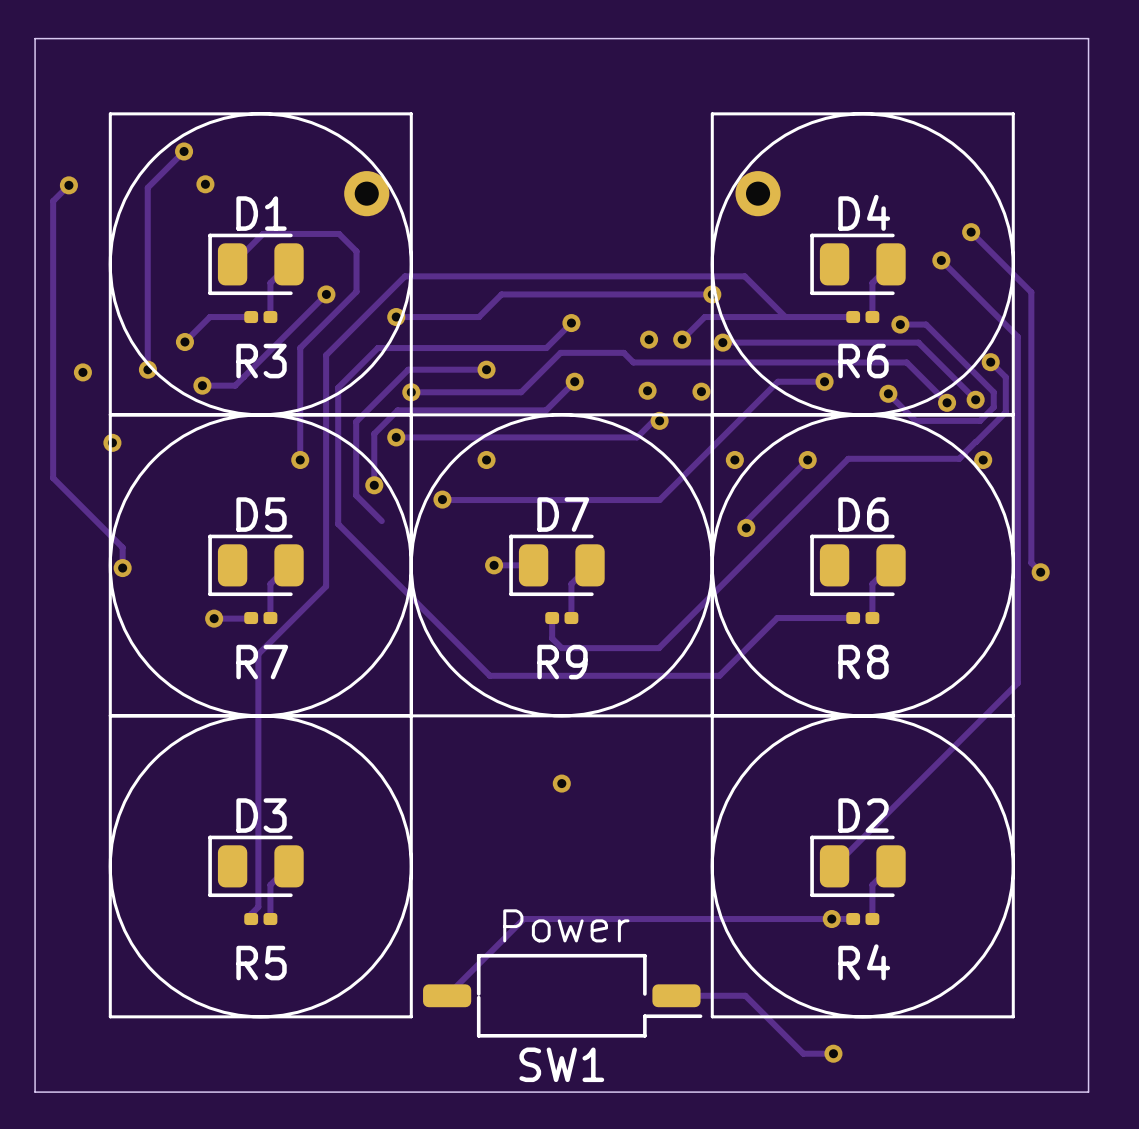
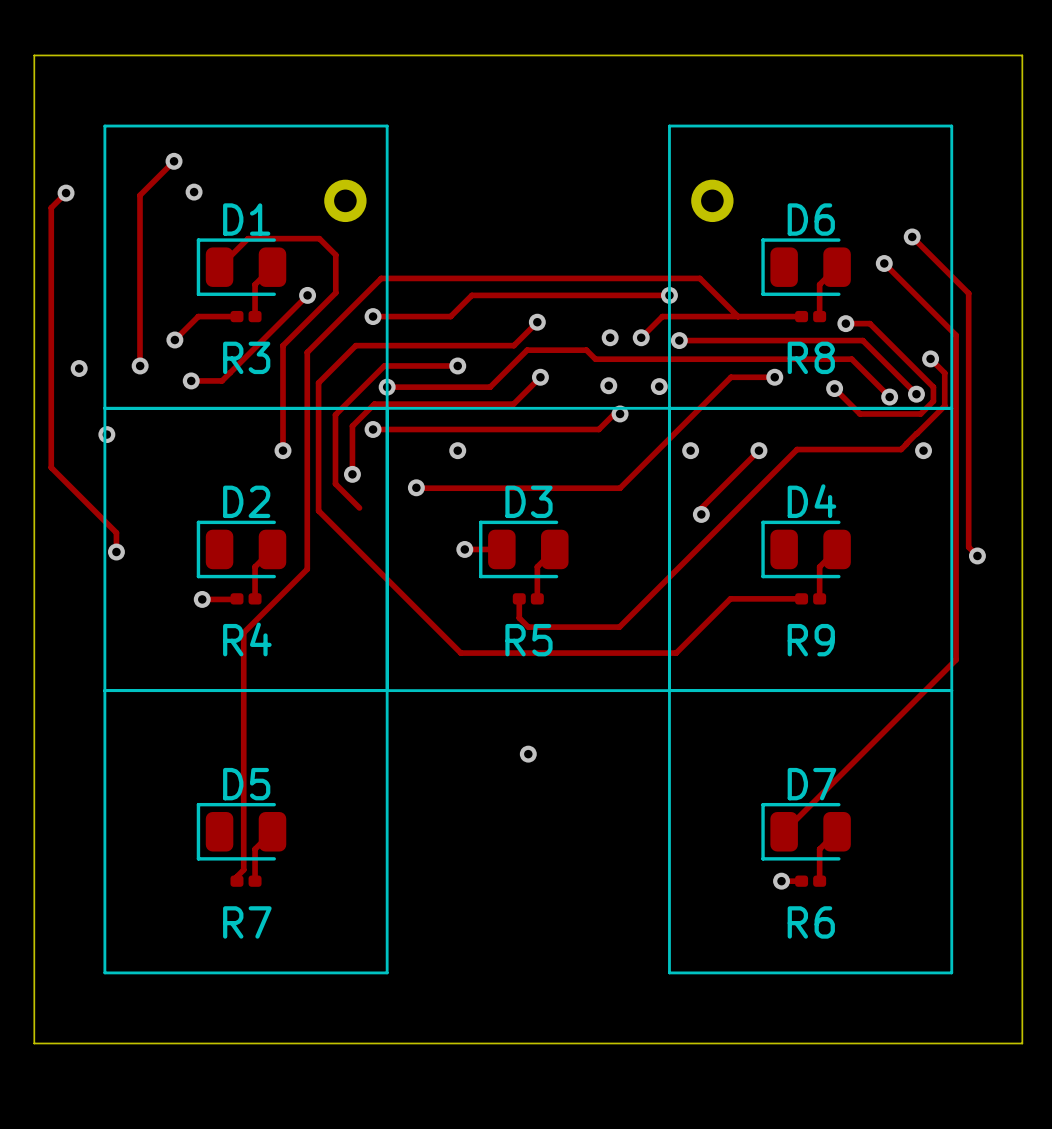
drawing: [108, 112, 1015, 1019] -> none
D4 name: D4 (864, 212) -> D6 (811, 219)
R6 name: R6 (863, 361) -> R8 (811, 357)
D5 name: D5 (261, 514) -> D2 (246, 501)
D7 name: D7 (563, 514) -> D3 (528, 501)
D6 name: D6 (863, 514) -> D4 (811, 501)
R7 name: R7 (262, 662) -> R4 (247, 639)
R9 name: R9 (562, 662) -> R5 (528, 640)
R8 name: R8 (863, 662) -> R9 (811, 640)
D3 name: D3 (261, 815) -> D5 (246, 784)
D2 name: D2 (863, 815) -> D7 (811, 784)
track: (831, 919) (523, 919) (447, 995) -> none
text: Power (566, 925) -> none
R4 name: R4 (864, 962) -> R6 (811, 922)
R5 name: R5 (261, 963) -> R7 (247, 922)
SW1: (562, 995) -> none
track: (676, 995) (745, 995) (803, 1053) (833, 1053) -> none
via: (833, 1053) -> none

